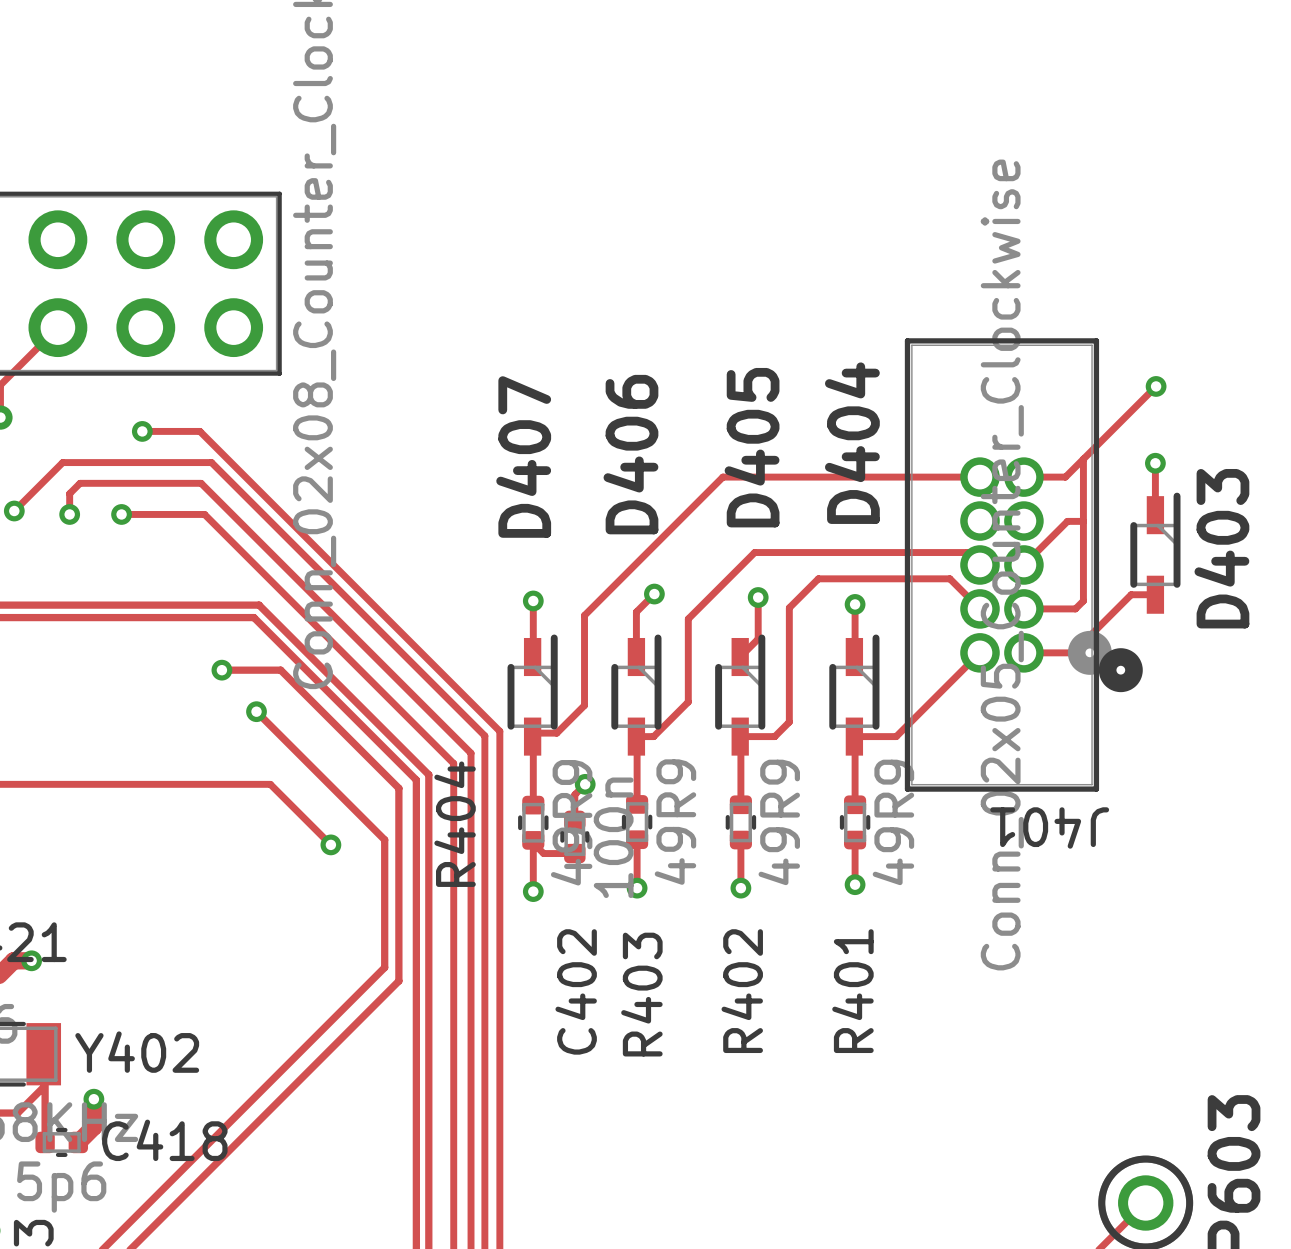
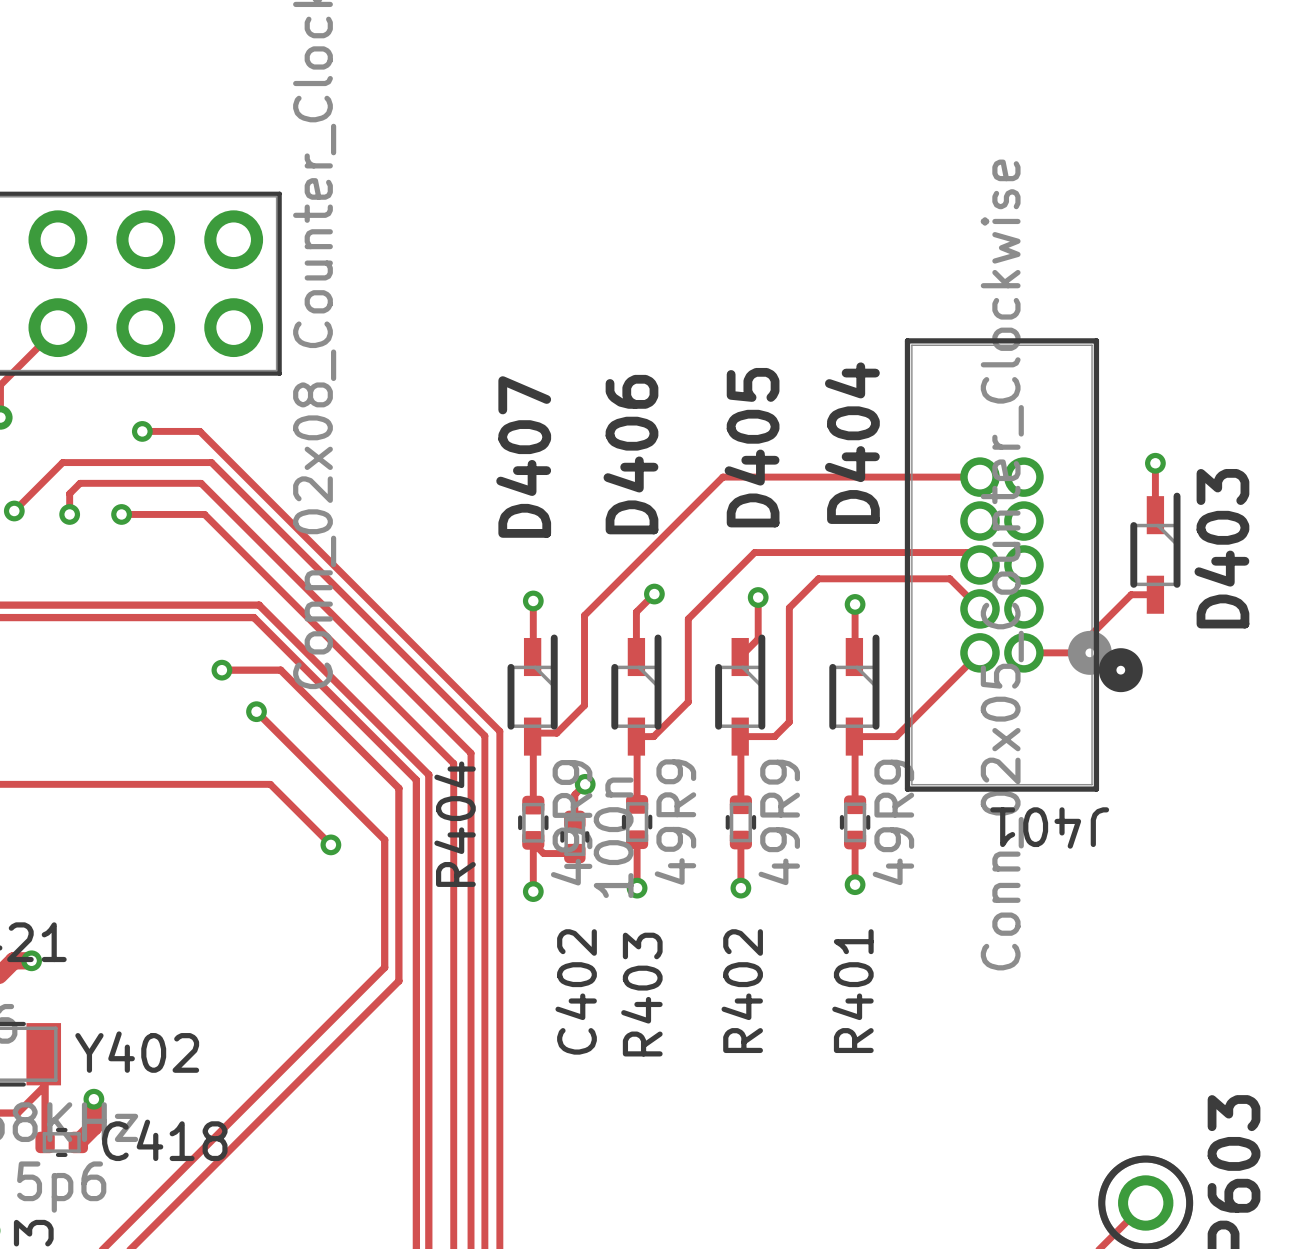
track: (1156, 386) (1065, 477) (1023, 477) -> none
via: (1156, 386) -> none
track: (1083, 459) (1083, 600) (1075, 608) (1023, 608) -> none
track: (1083, 521) (1067, 521) (1023, 564) -> none

